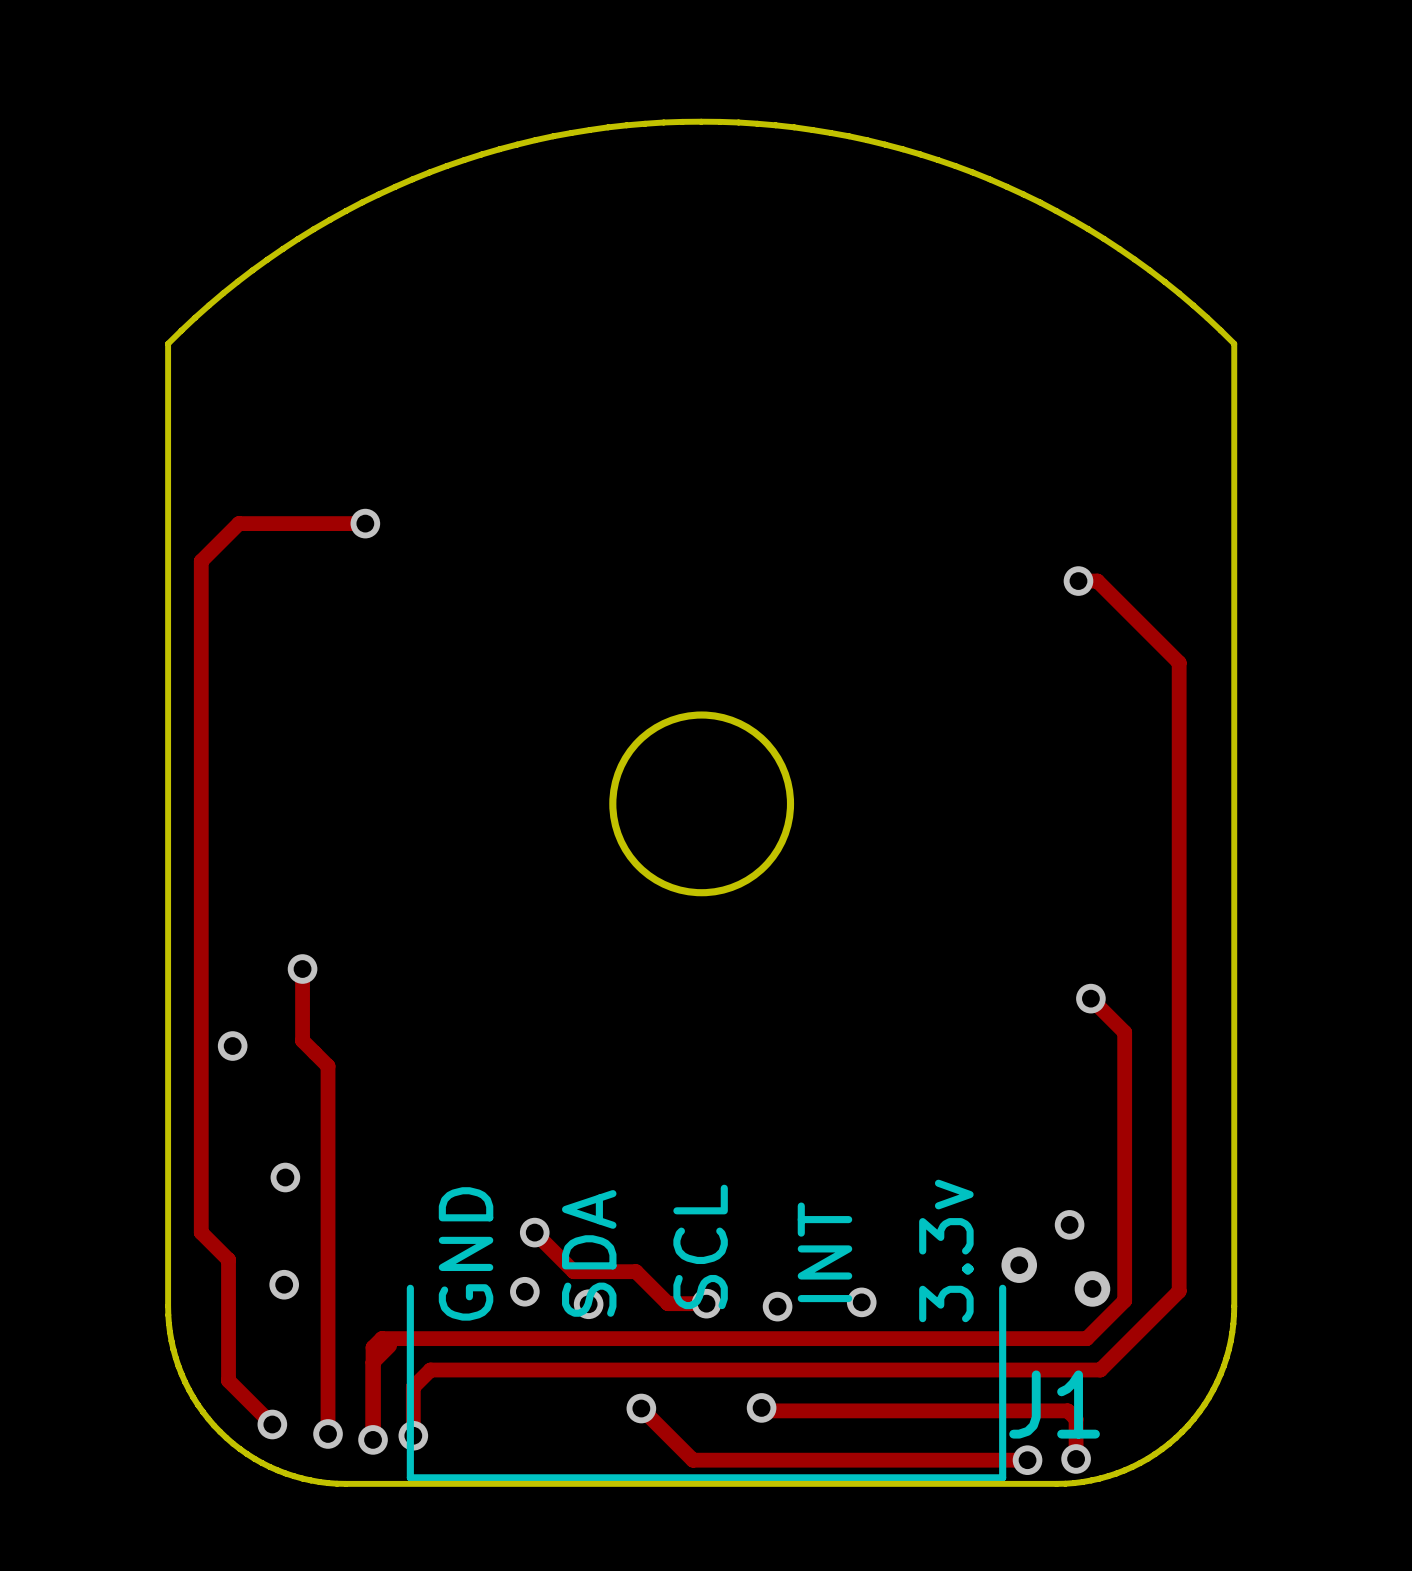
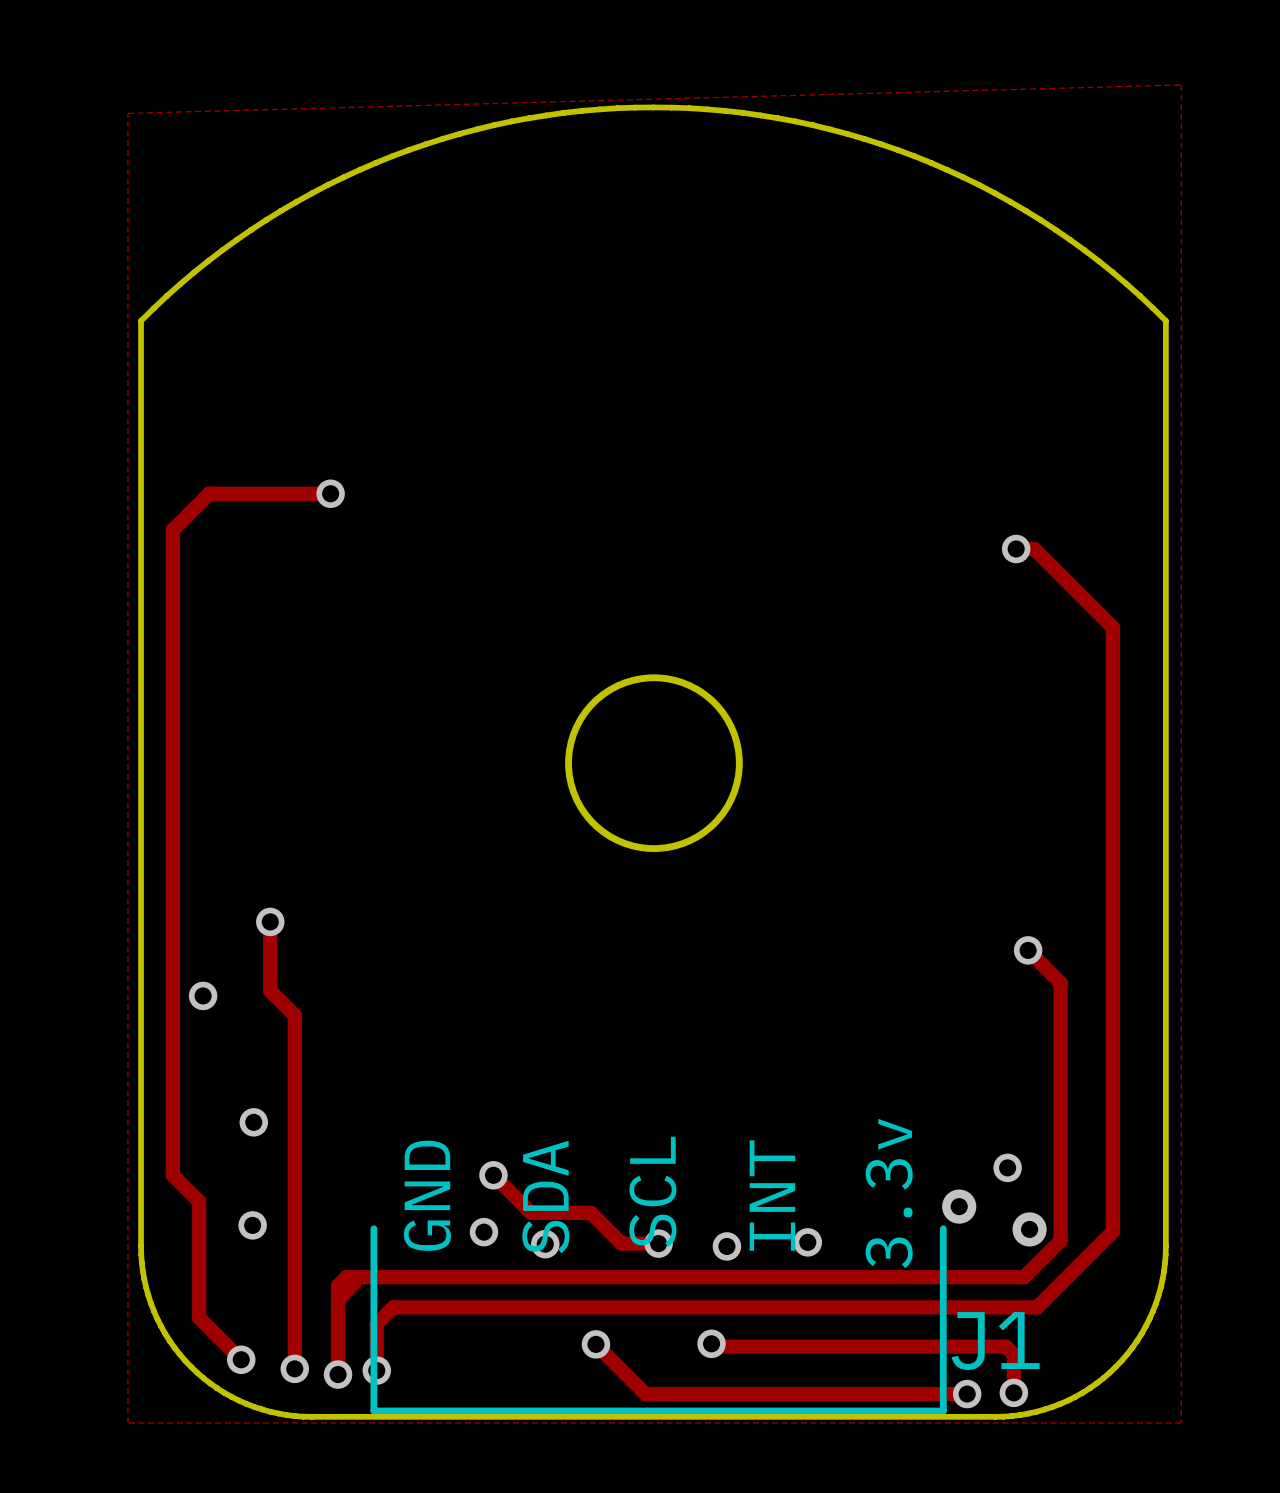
zone outline: none -> (1181, 84) (127, 113) (127, 1422) (1181, 1422) (1181, 84)

